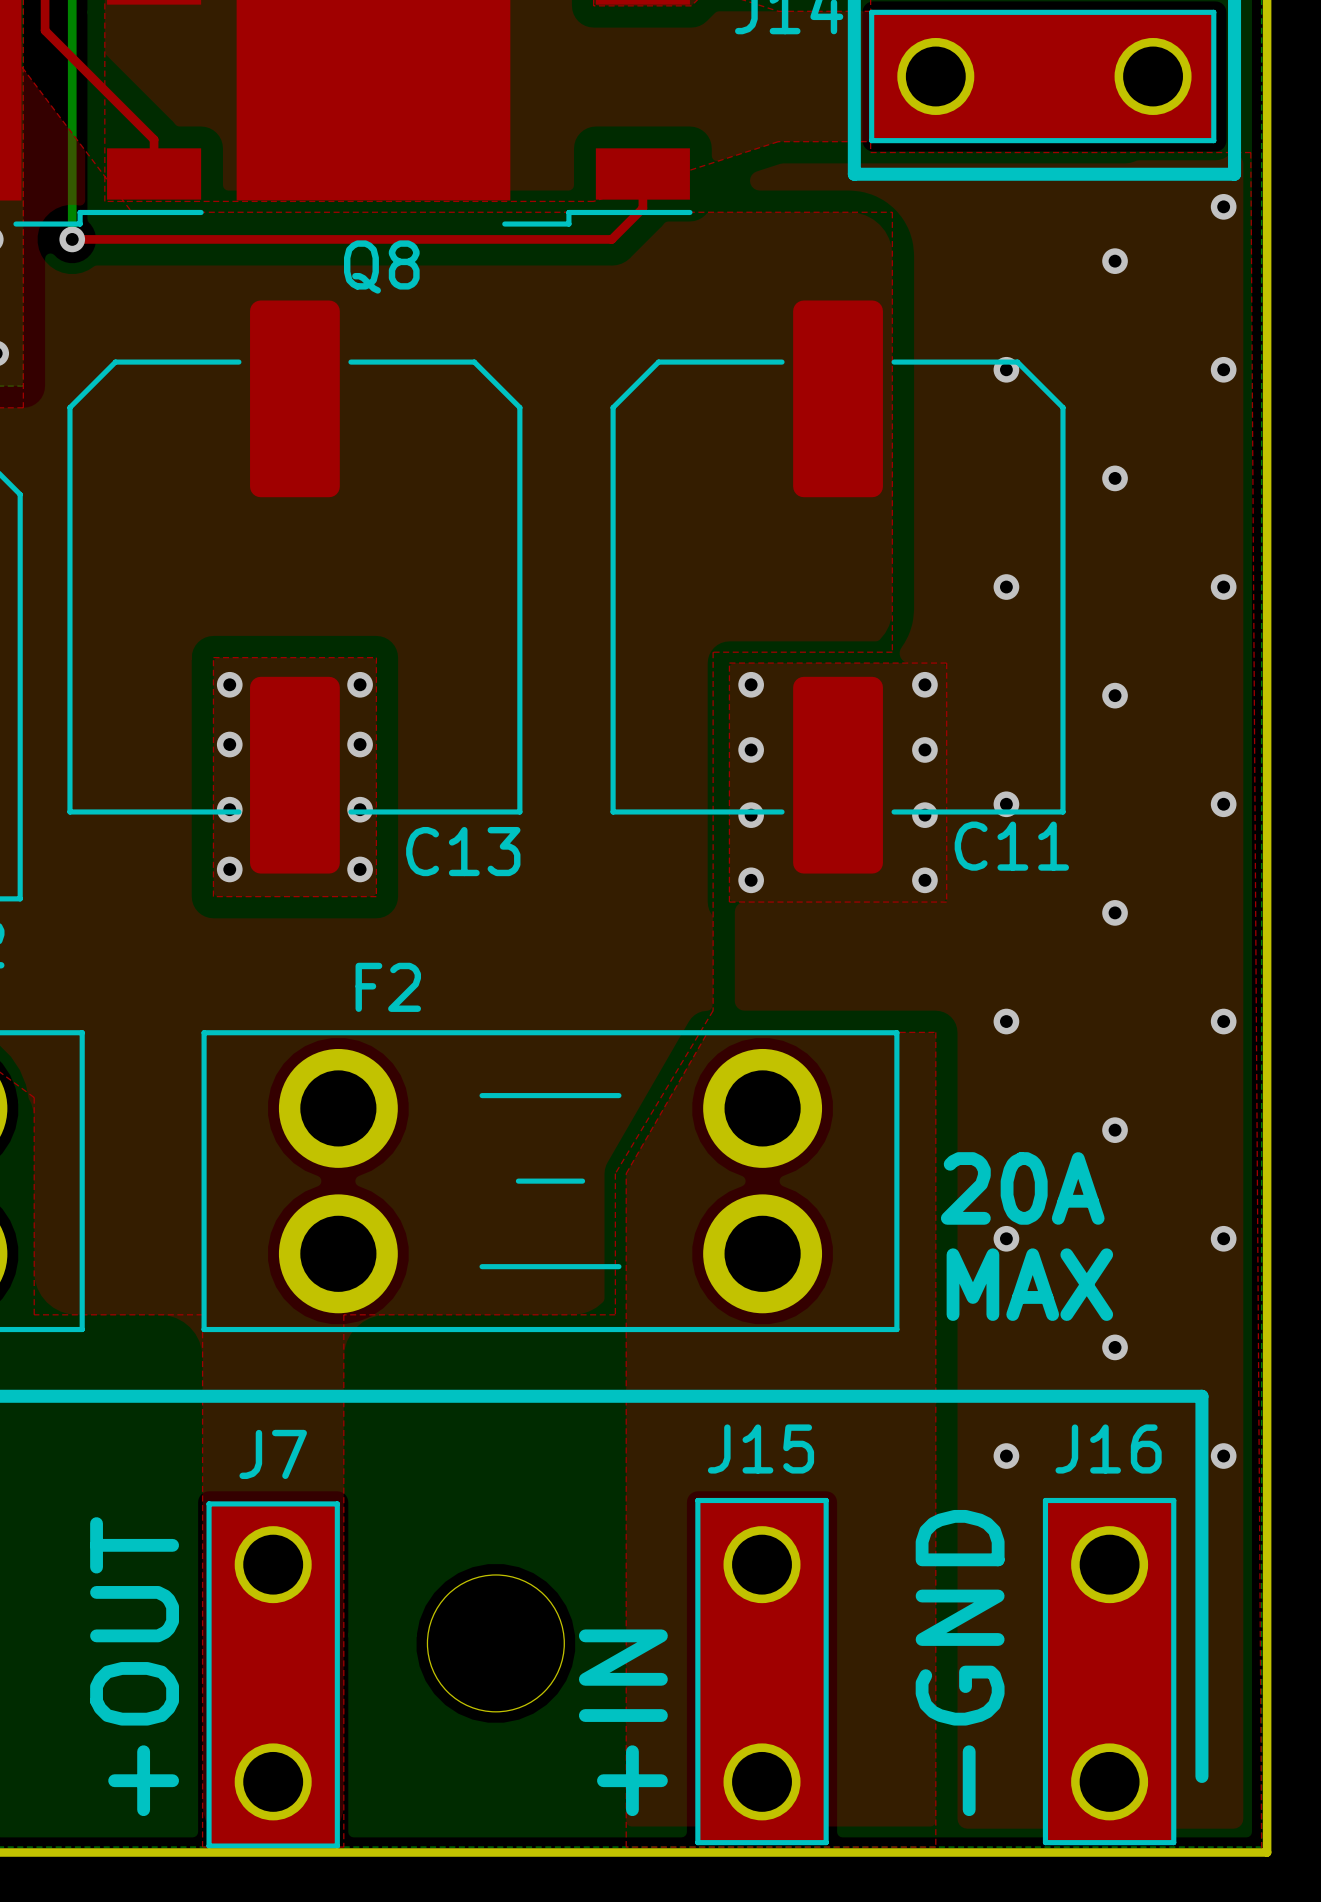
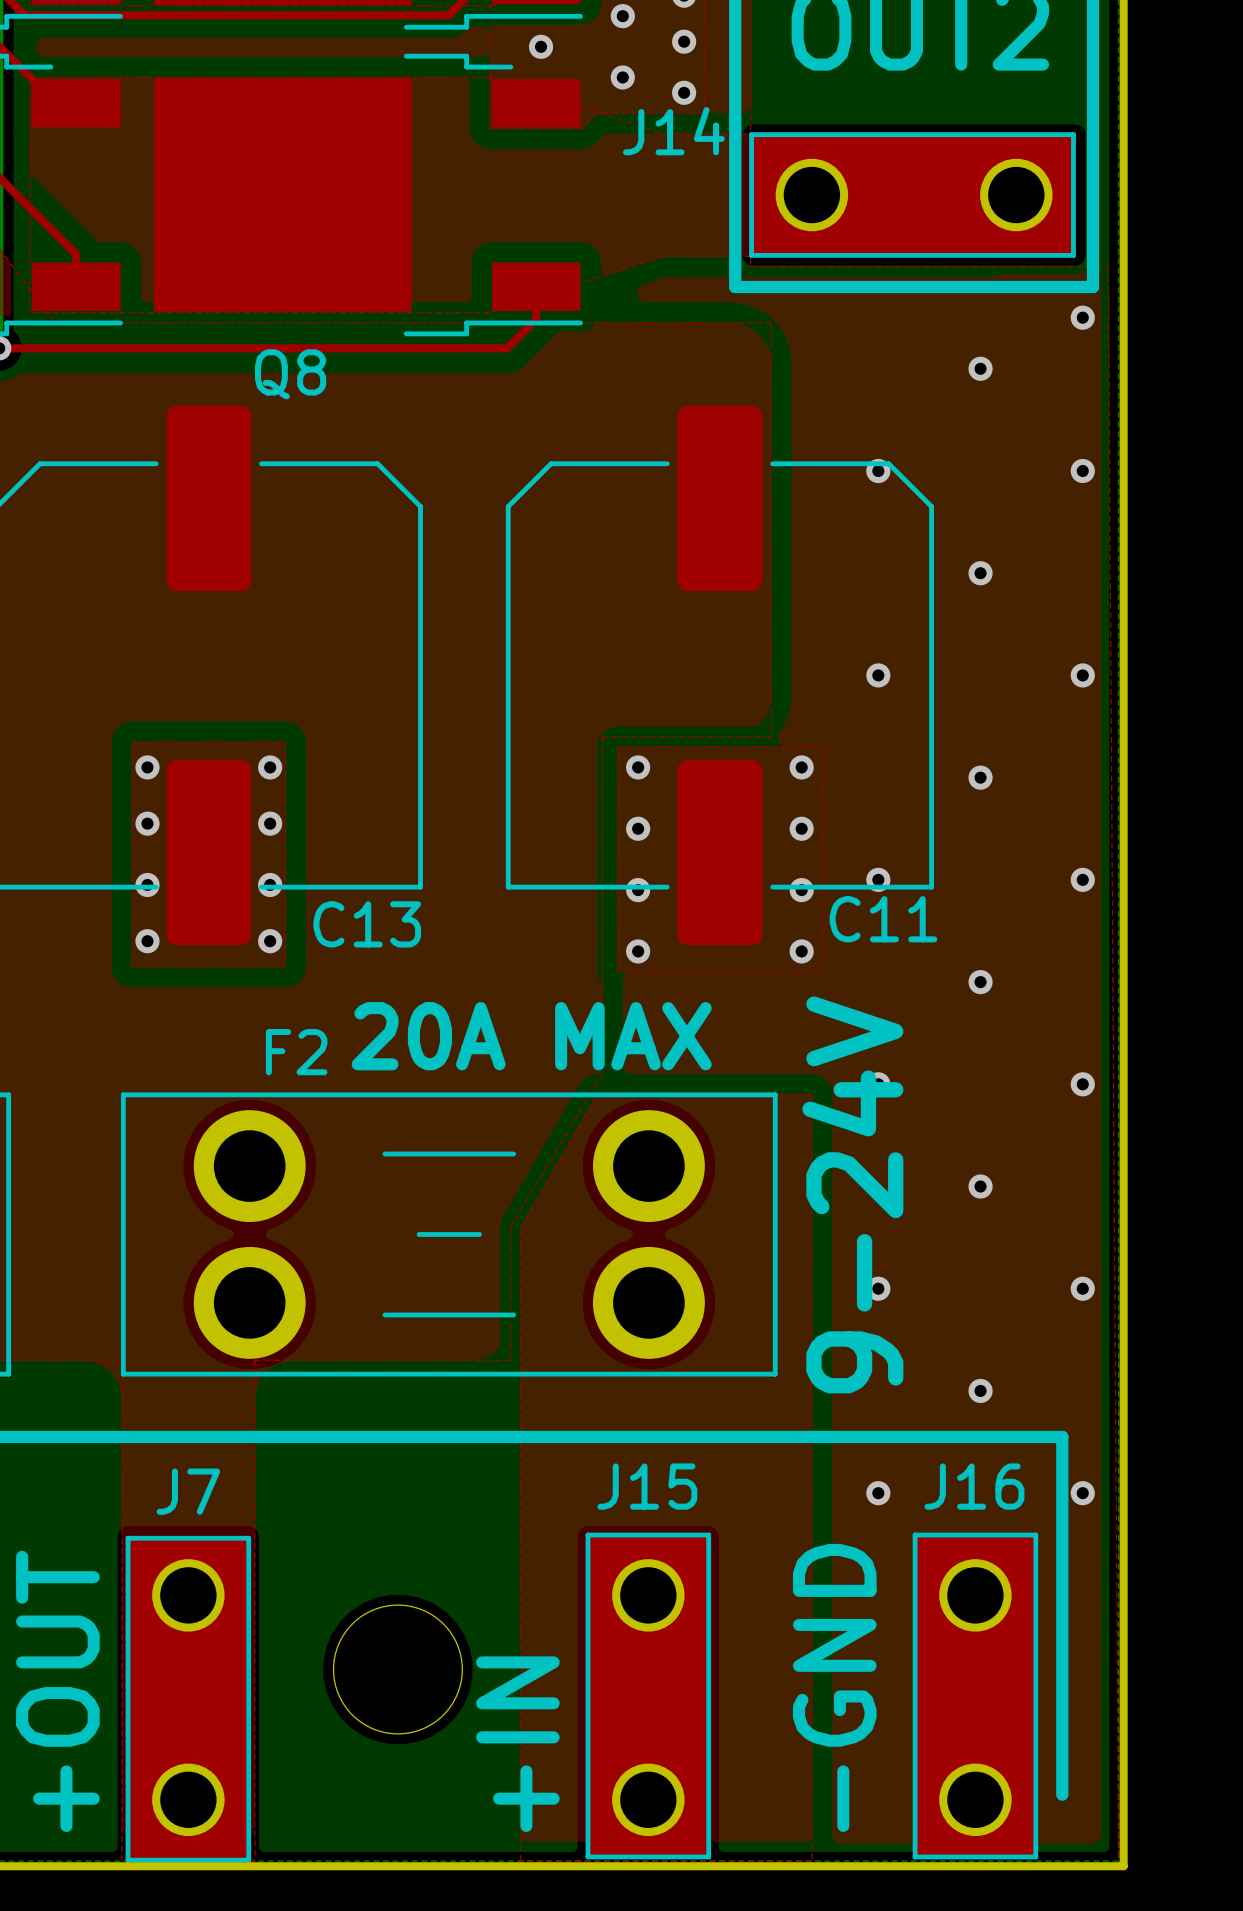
text: none -> 20A MAX (531, 1036)
text: none -> 9-24V (852, 1194)
text: 20A (1022, 1188) -> none
text: MAX (1029, 1284) -> none

